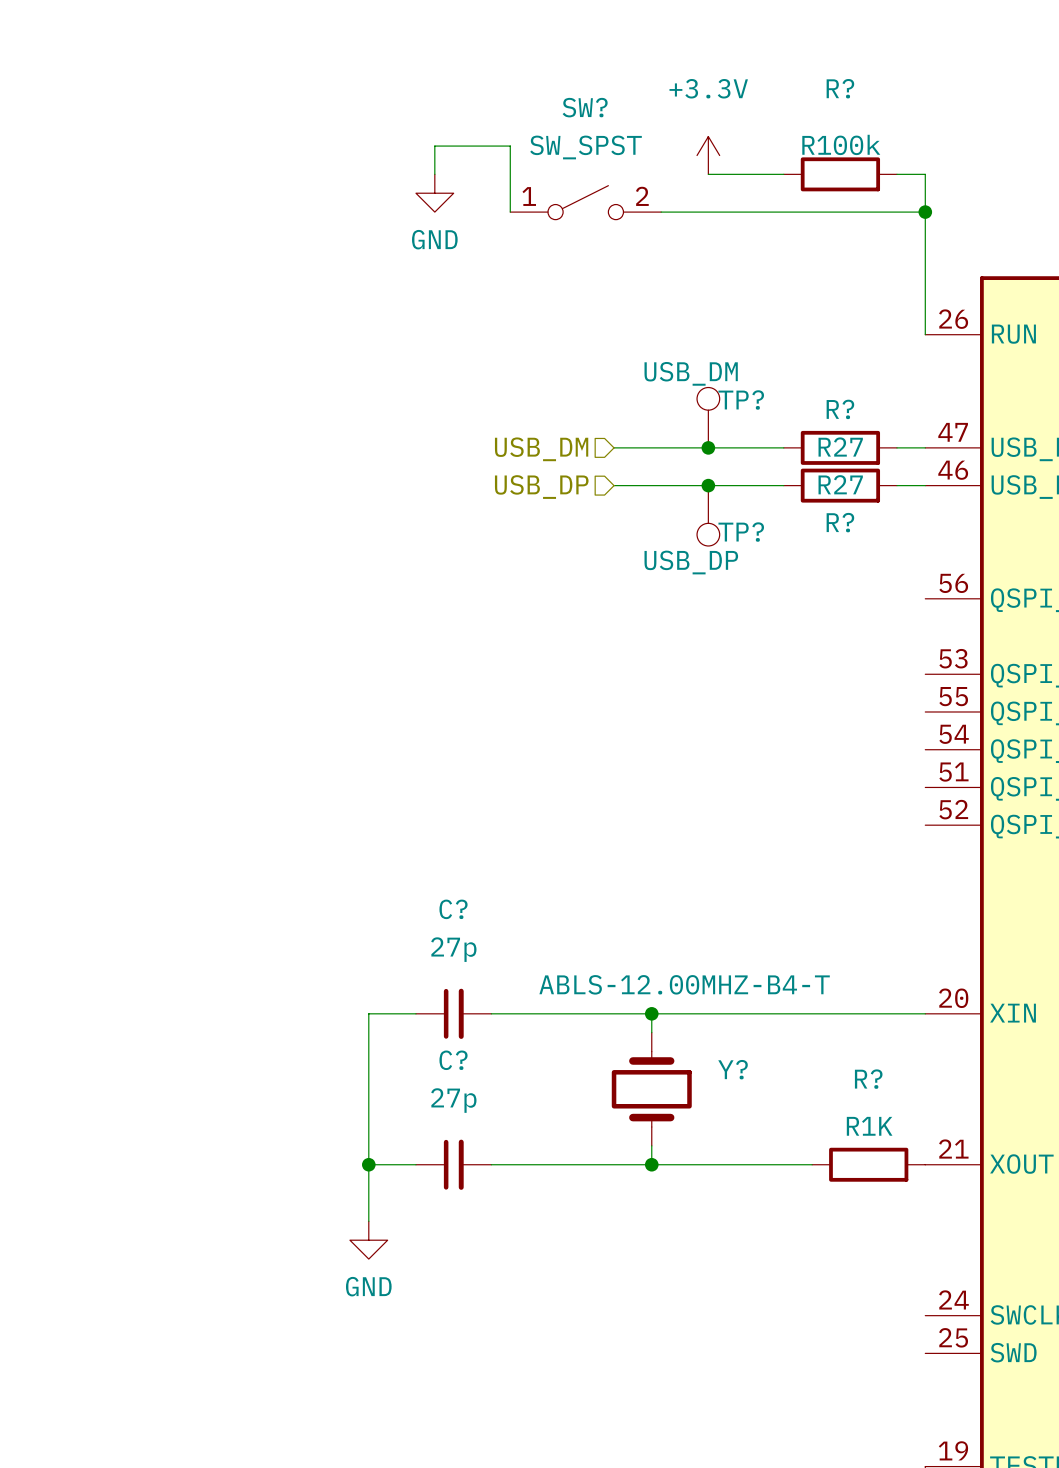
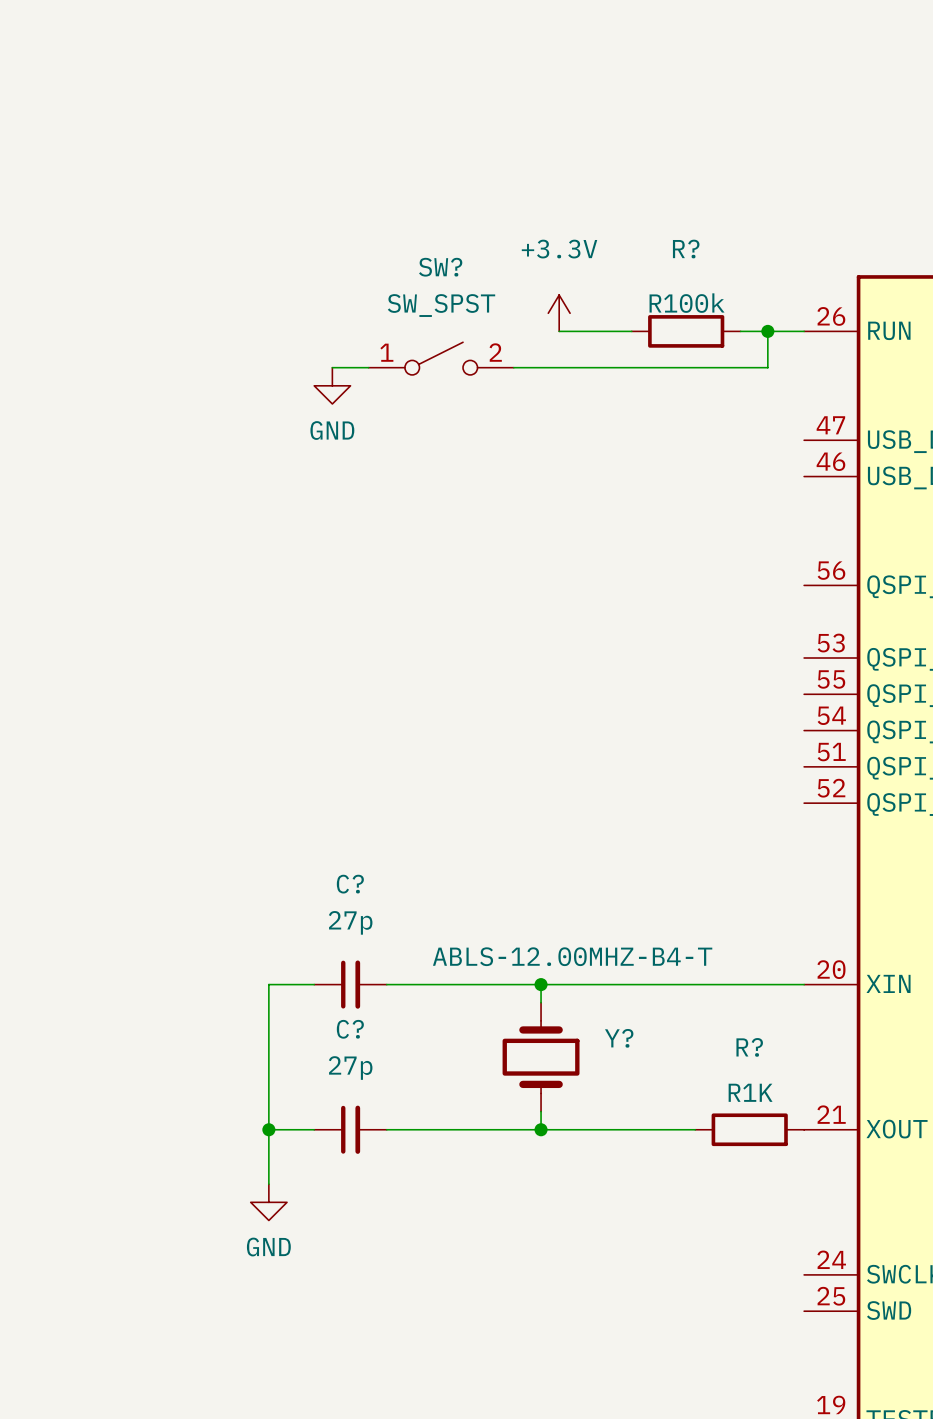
power symbol position: +3.3V (708, 155) -> +3.3V (559, 313)
wire: (434, 174) (434, 146) (510, 146) (510, 212) -> none
wire: (708, 174) (783, 174) -> (559, 331) (631, 331)
R? position: (840, 174) -> (686, 331)
wire: (897, 174) (925, 174) (925, 334) -> (740, 331) (804, 331)
power symbol position: GND (434, 193) -> GND (332, 385)
SW? position: (585, 202) -> (441, 358)
wire: (661, 212) (925, 212) -> none
junction: (925, 212) -> none
wire: none -> (767, 331) (767, 367) (513, 367)
junction: none -> (767, 331)
wire: none -> (332, 367) (368, 367)
TP?: USB_DM (708, 417) -> none
wire: (614, 447) (783, 447) -> none
junction: (708, 447) -> none
R?: R27 (840, 447) -> none
wire: (897, 447) (925, 447) -> none
hierarchical label: USB_DM (541, 449) -> none
wire: (614, 485) (783, 485) -> none
junction: (708, 485) -> none
R?: R27 (840, 485) -> none
wire: (897, 485) (925, 485) -> none
hierarchical label: USB_DP (541, 487) -> none
TP?: USB_DP (708, 515) -> none

